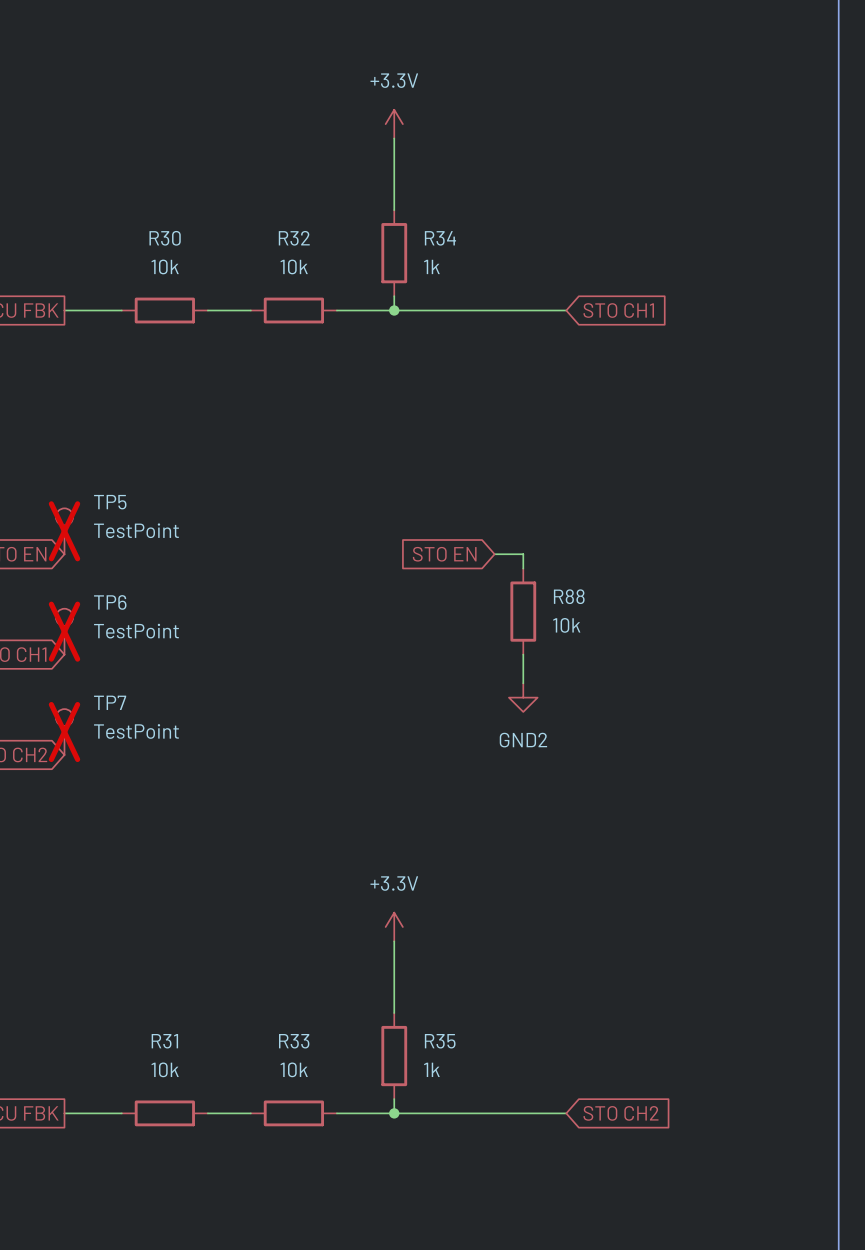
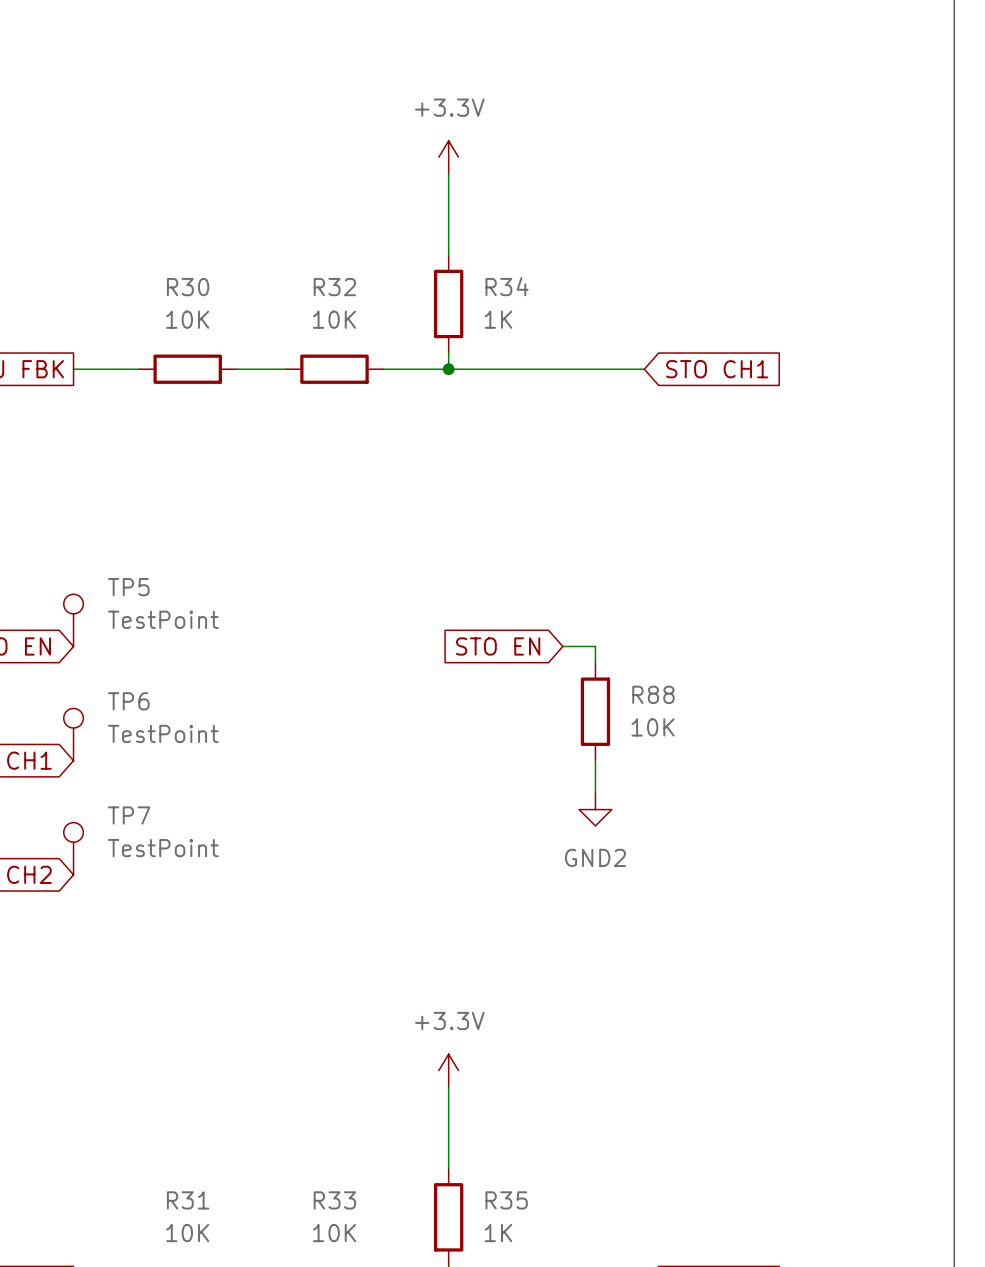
R30 value: 10k (165, 266) -> 10K (187, 319)
R32 value: 10k (294, 266) -> 10K (334, 319)
R34 value: 1k (431, 266) -> 1K (498, 319)
TP5 do-not-place cross: (64, 531) -> none
R88 value: 10k (566, 625) -> 10K (653, 727)
TP6 do-not-place cross: (64, 631) -> none
TP7 do-not-place cross: (64, 732) -> none
R31 value: 10k (165, 1069) -> 10K (187, 1233)
R33 value: 10k (294, 1069) -> 10K (334, 1233)
R35 value: 1k (431, 1069) -> 1K (498, 1233)

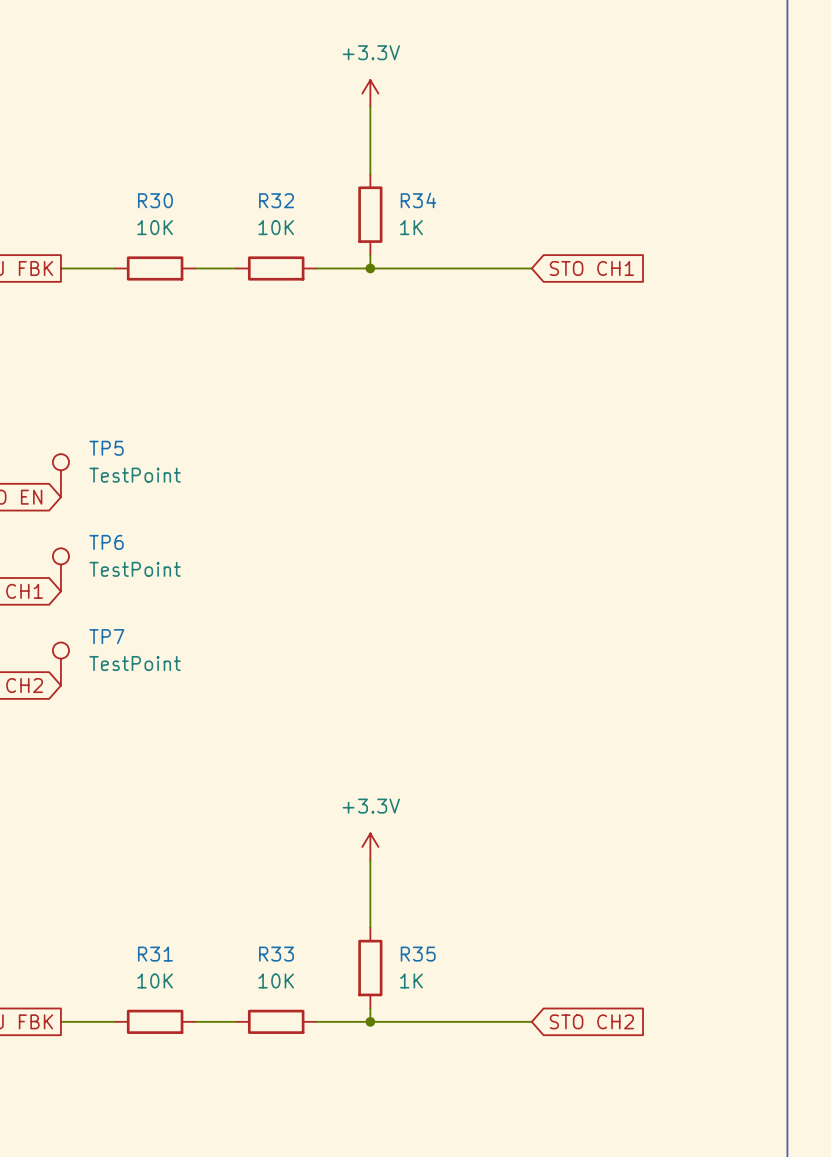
global label: STO EN (498, 646) -> none
wire: (562, 646) (595, 646) (595, 662) -> none
R88: 10K (595, 711) -> none
wire: (595, 760) (595, 793) -> none
power symbol: GND2 (595, 809) -> none

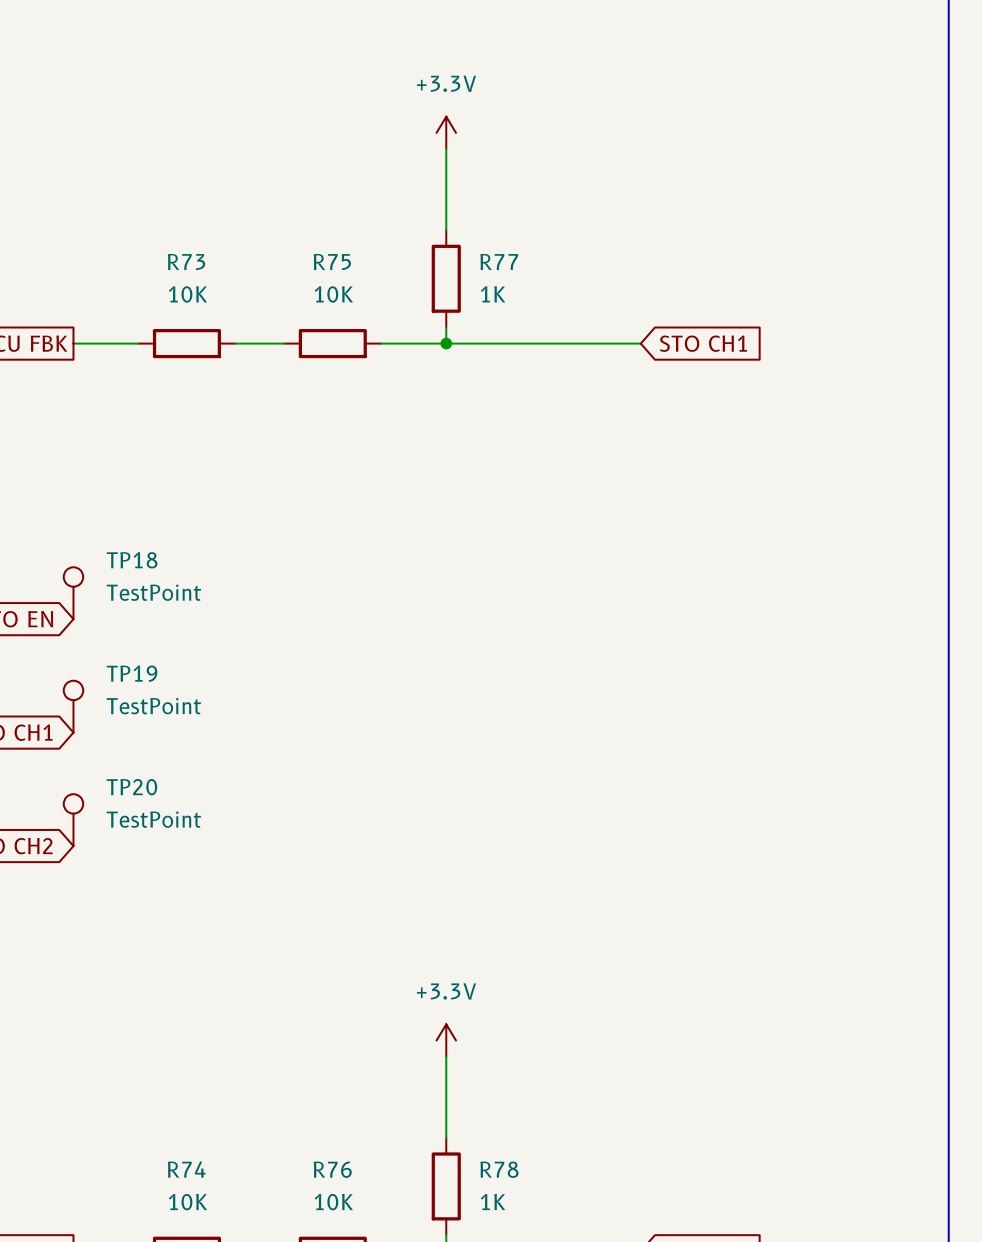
R30 name: R30 (155, 200) -> R73 (186, 261)
R32 name: R32 (276, 200) -> R75 (332, 261)
R34 name: R34 (418, 200) -> R77 (499, 261)
TP5 name: TP5 (106, 448) -> TP18 (132, 560)
TP6 name: TP6 (106, 542) -> TP19 (132, 673)
TP7 name: TP7 (106, 636) -> TP20 (131, 787)
R31 name: R31 (155, 954) -> R74 (186, 1169)
R33 name: R33 (276, 954) -> R76 (332, 1169)
R35 name: R35 (418, 954) -> R78 (499, 1169)

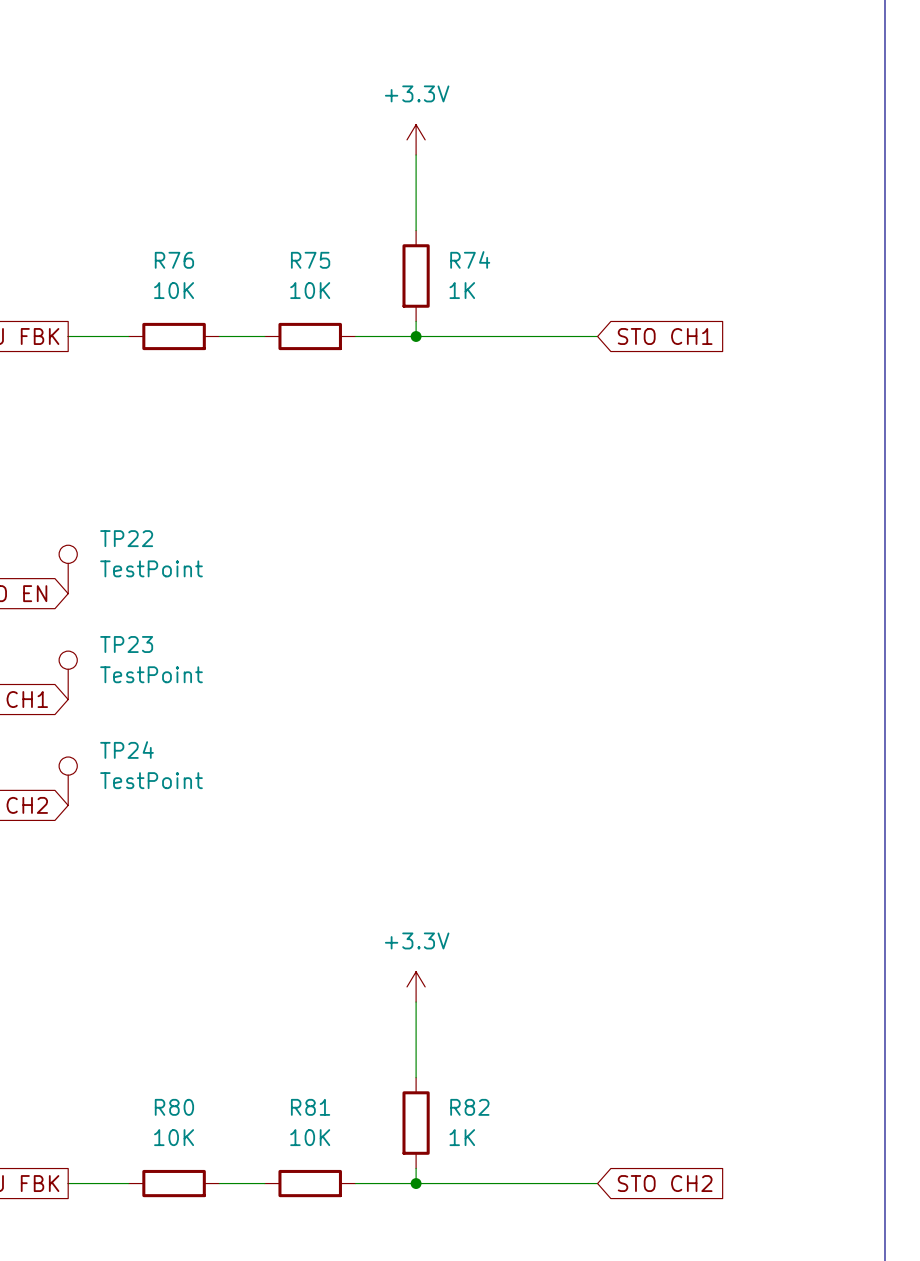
R73 name: R73 (186, 261) -> R76 (174, 260)
R77 name: R77 (499, 261) -> R74 (470, 259)
TP18 name: TP18 (132, 560) -> TP22 (126, 538)
TP19 name: TP19 (132, 673) -> TP23 (126, 644)
TP20 name: TP20 (131, 787) -> TP24 (127, 750)
R74 name: R74 (186, 1169) -> R80 (174, 1107)
R76 name: R76 (332, 1169) -> R81 (310, 1107)
R78 name: R78 (499, 1169) -> R82 (469, 1107)

